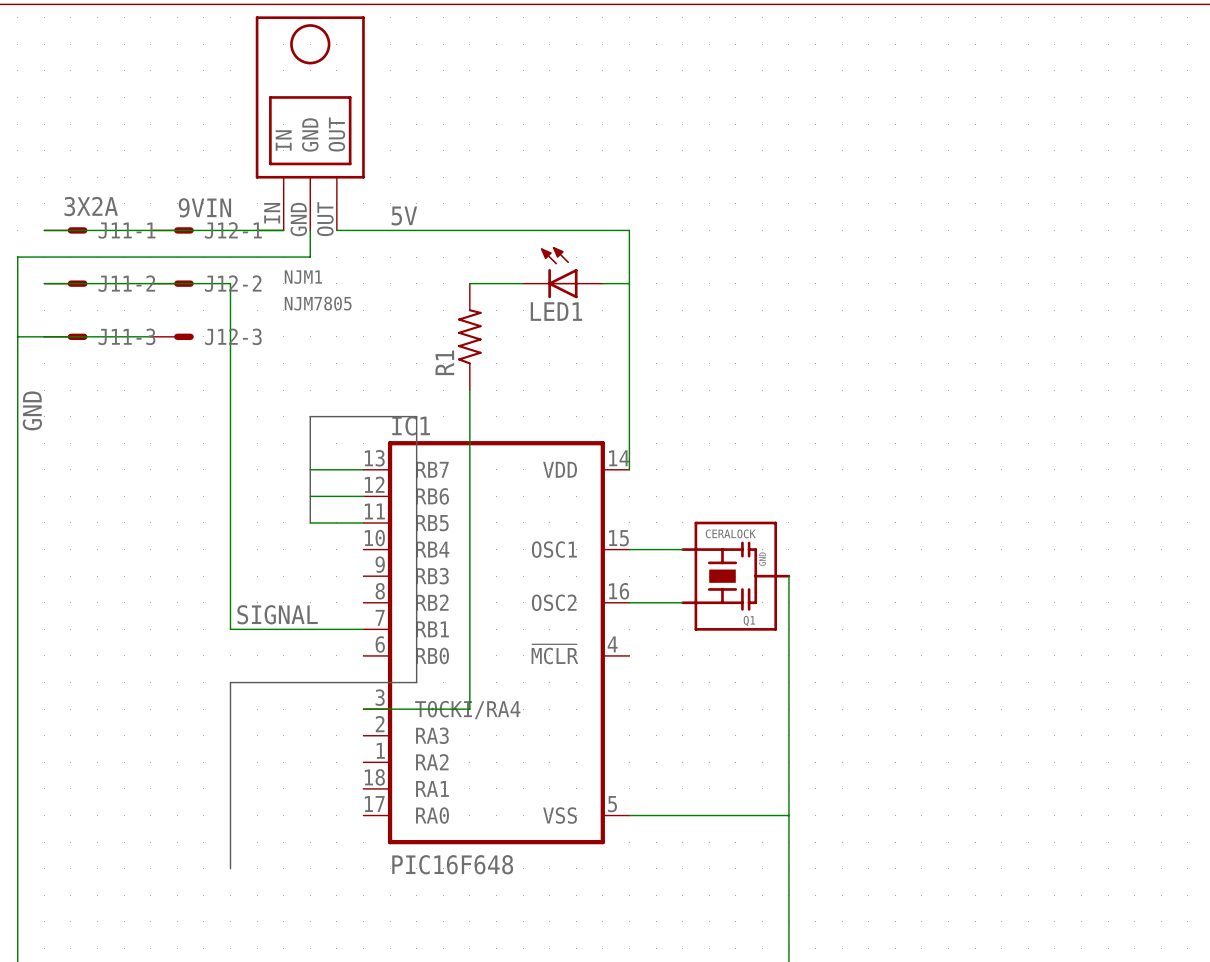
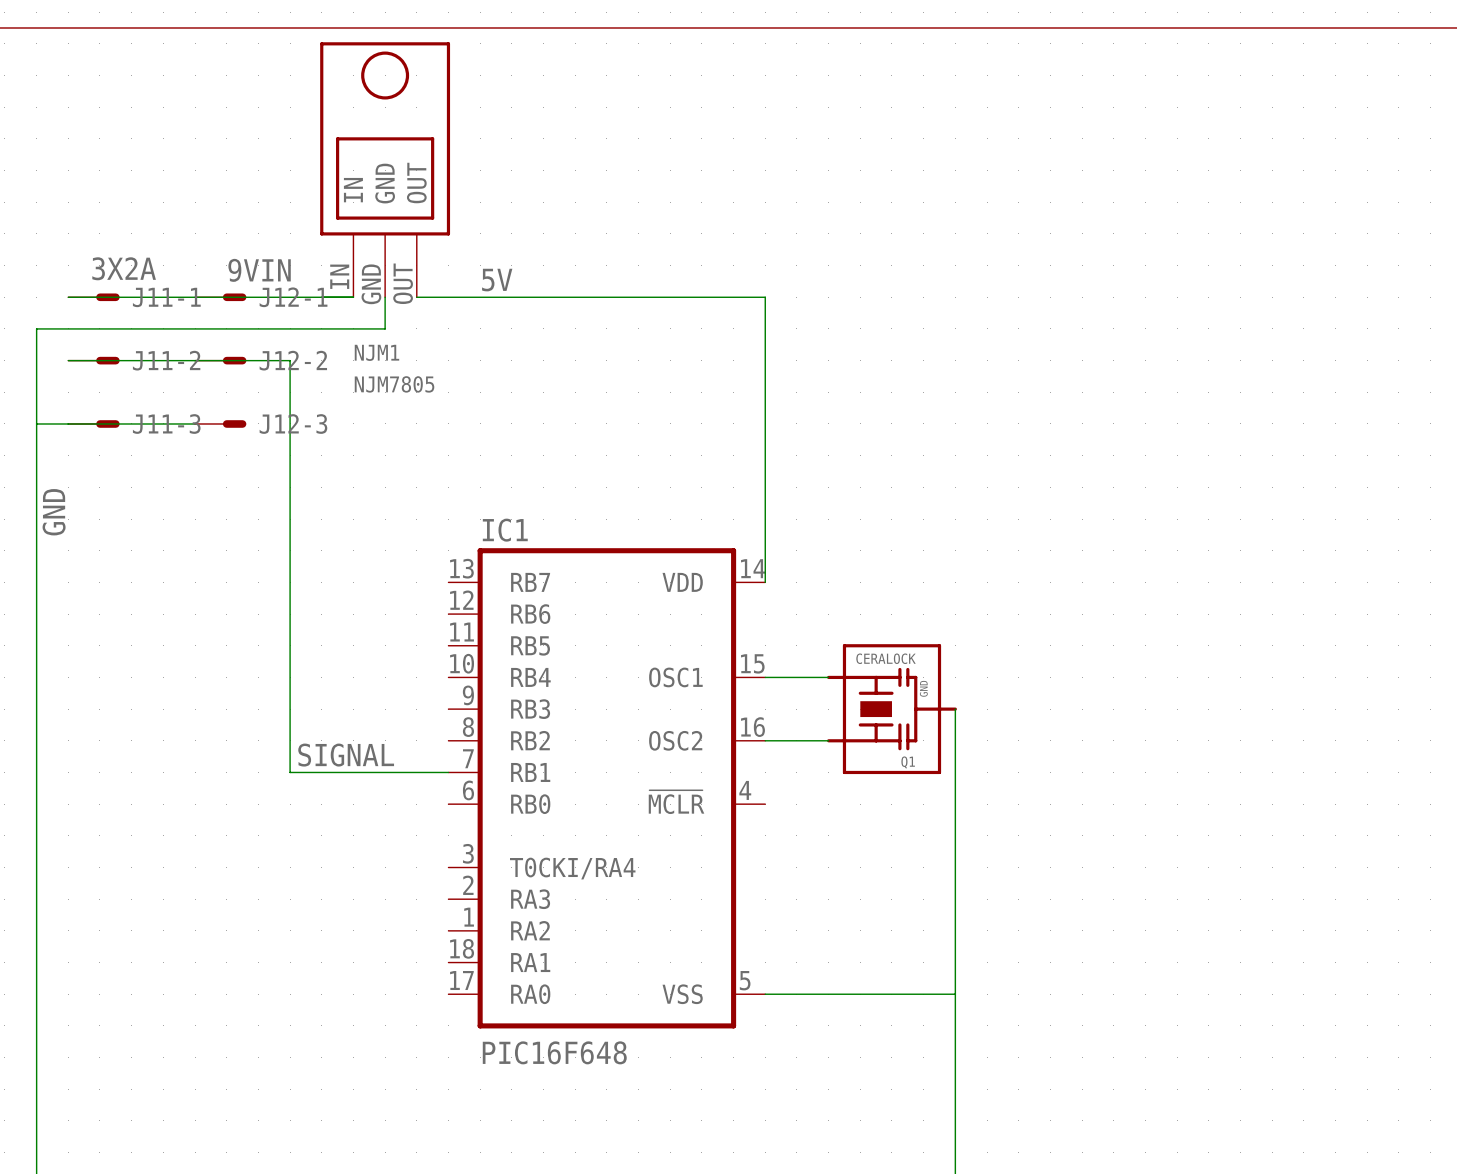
LED1: (562, 272) -> none
wire: (469, 283) (523, 283) -> none
wire: (602, 283) (629, 283) -> none
R1: (469, 336) -> none
wire: (469, 390) (469, 709) (363, 709) -> none
wire: (310, 469) (363, 469) -> none
wire: (310, 496) (363, 496) -> none
bus: (310, 522) (310, 416) (416, 416) (416, 682) (230, 682) (230, 868) -> none
wire: (310, 522) (363, 522) -> none

